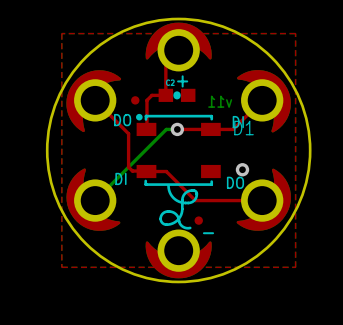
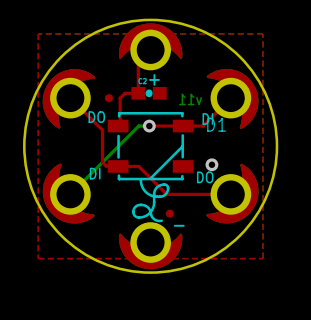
D1 footprint: [136, 113, 221, 186] -> [107, 111, 194, 181]

